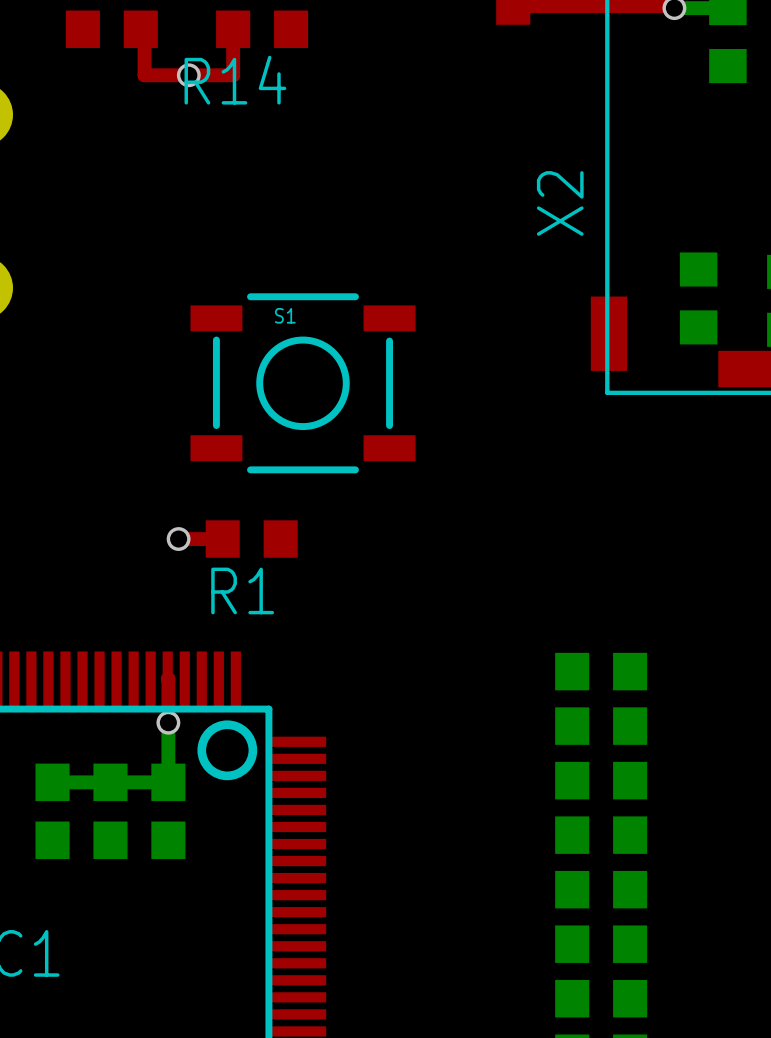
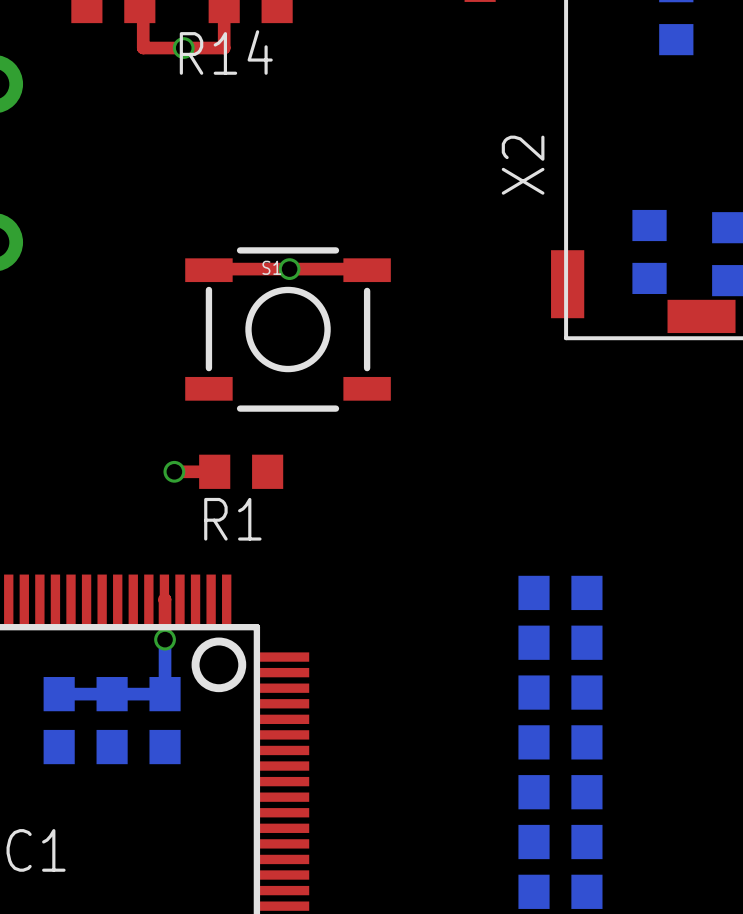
via: none -> (289, 269)
top track: none -> (208, 270) (367, 270)

